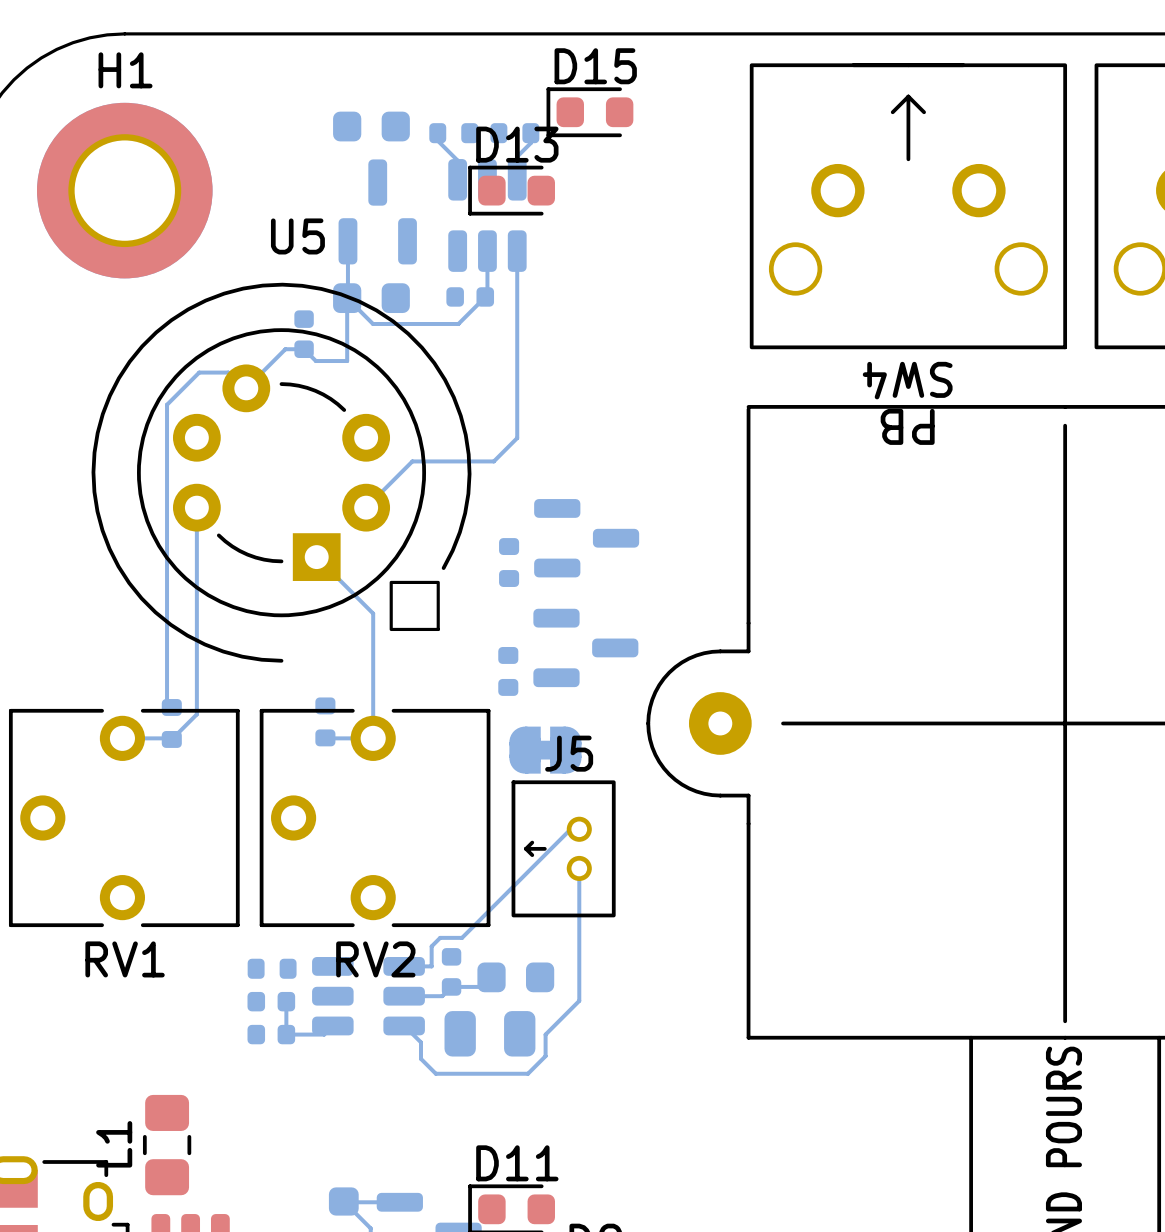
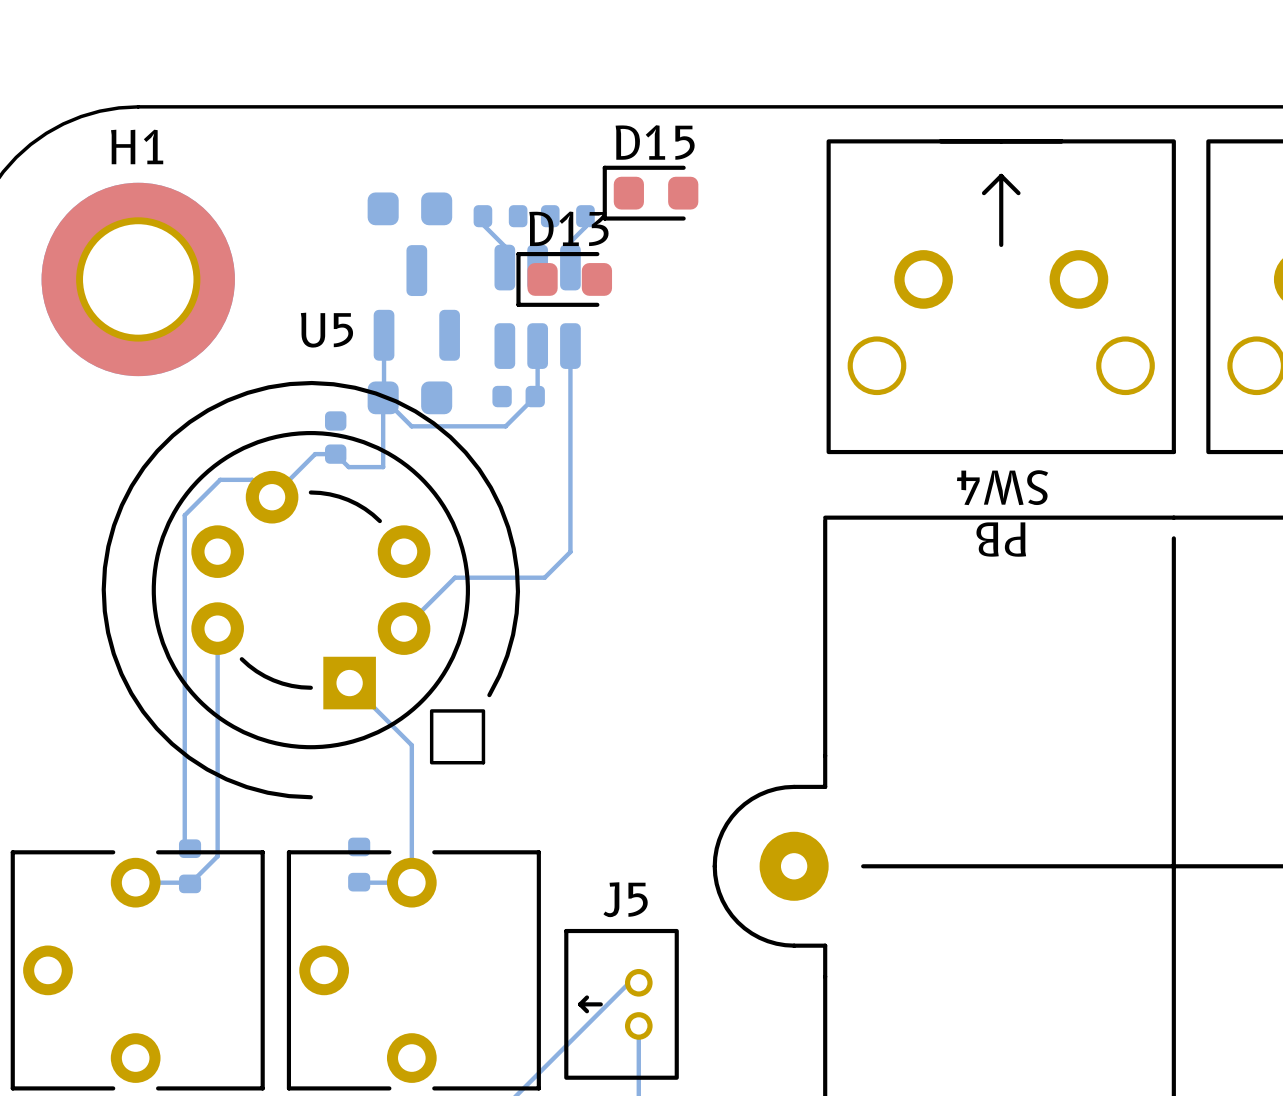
part: (586, 538) -> none
part: (509, 562) -> none
part: (585, 647) -> none
part: (508, 671) -> none
part: (545, 750) -> none

